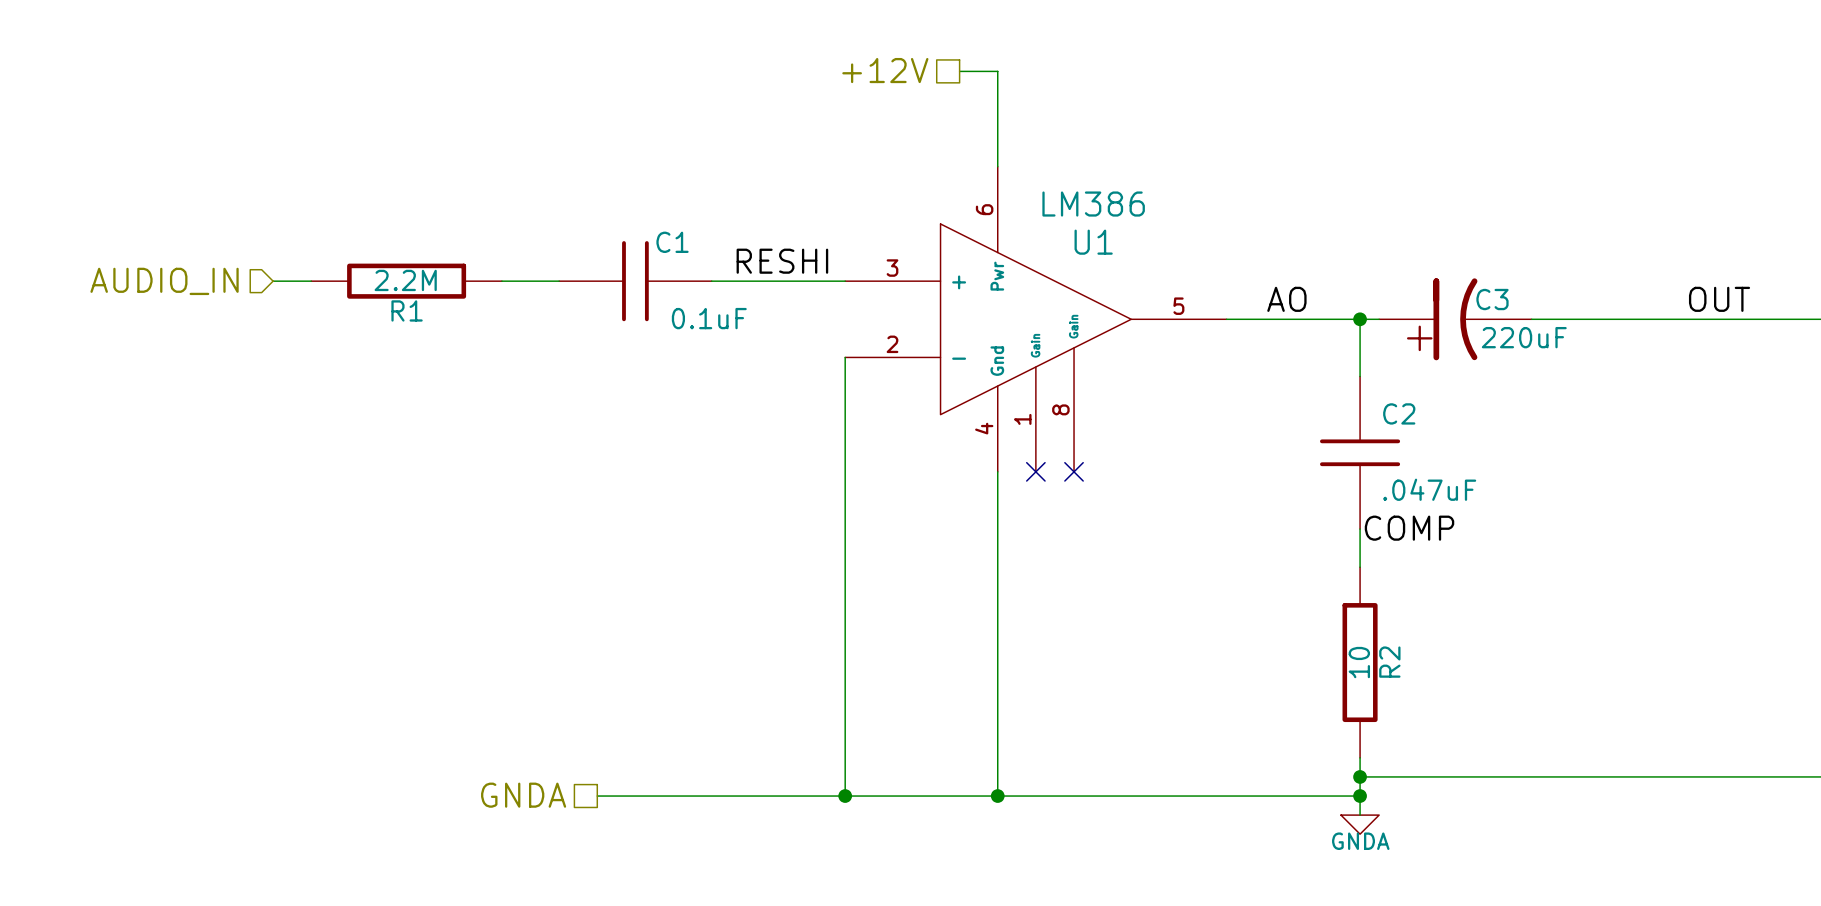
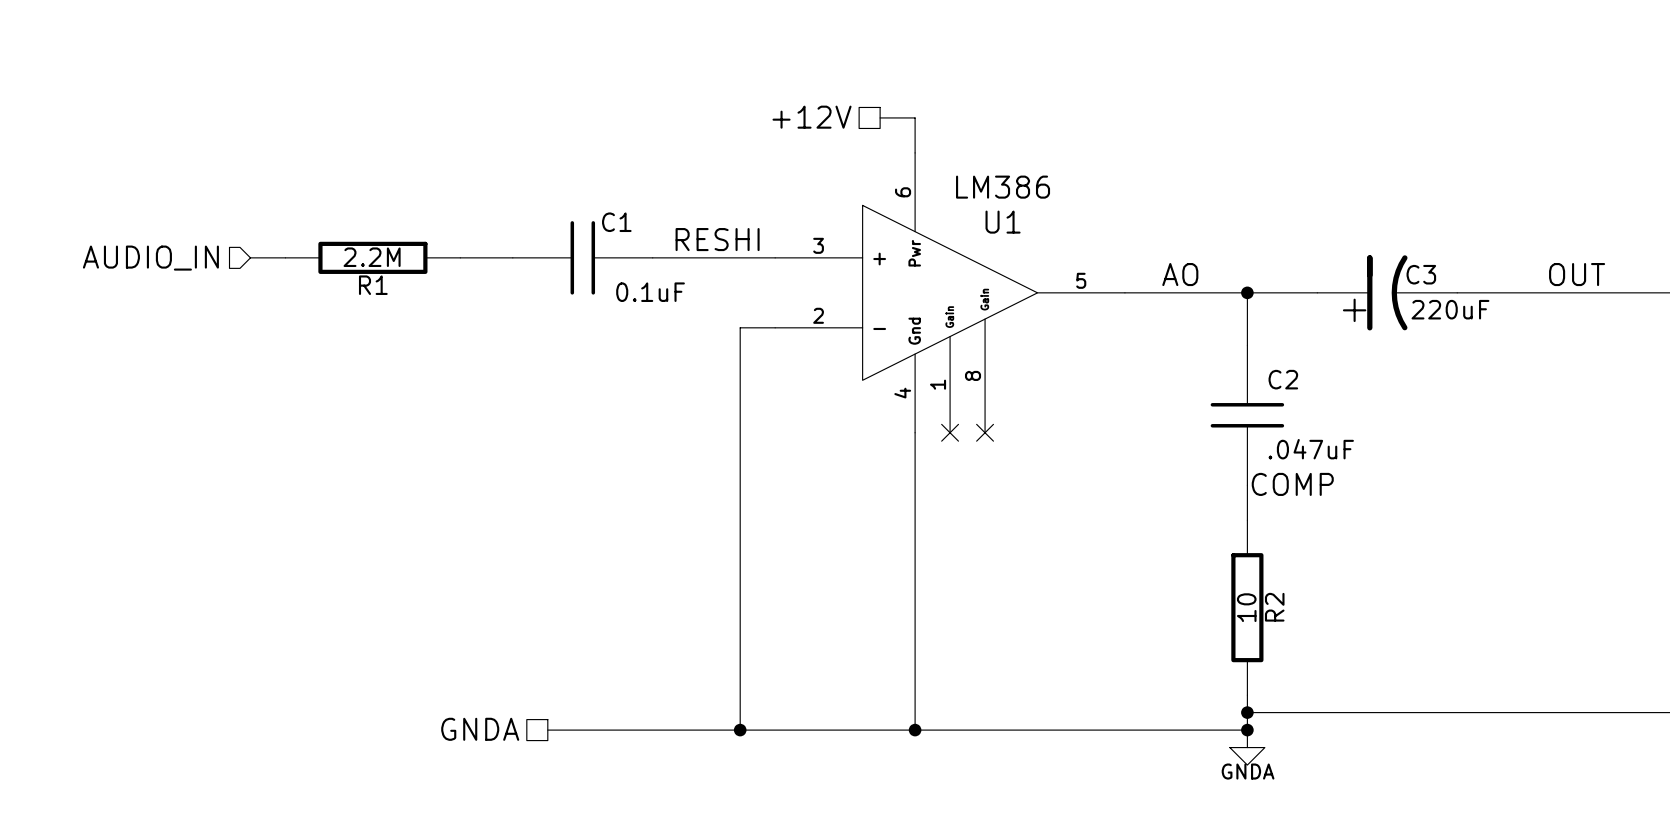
hierarchical label position: +12V (885, 70) -> +12V (812, 117)
wire: (959, 71) (997, 71) (997, 128) -> (880, 117) (915, 117)
C3 position: (1455, 319) -> (1387, 292)
wire: (845, 357) (845, 796) -> (775, 327) (740, 327) (740, 730)
junction position: (845, 796) -> (740, 730)

